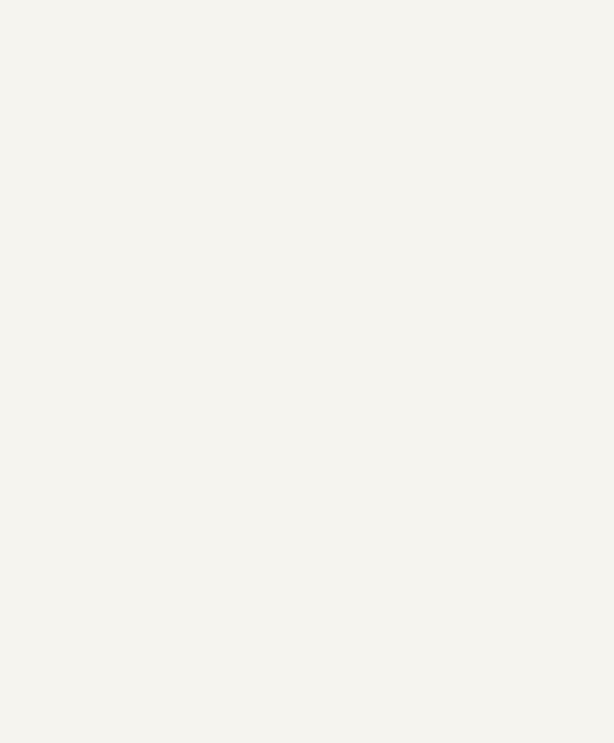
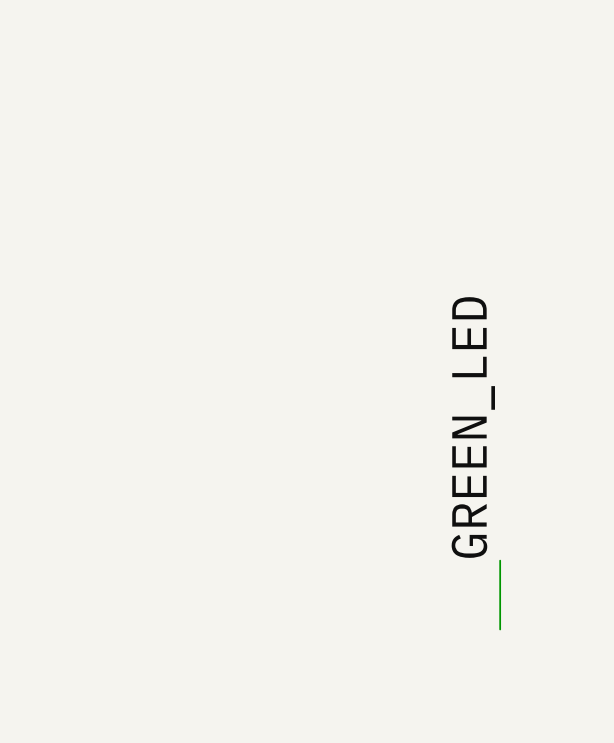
label: none -> GREEN_LED (473, 427)
wire: none -> (500, 560) (500, 629)

